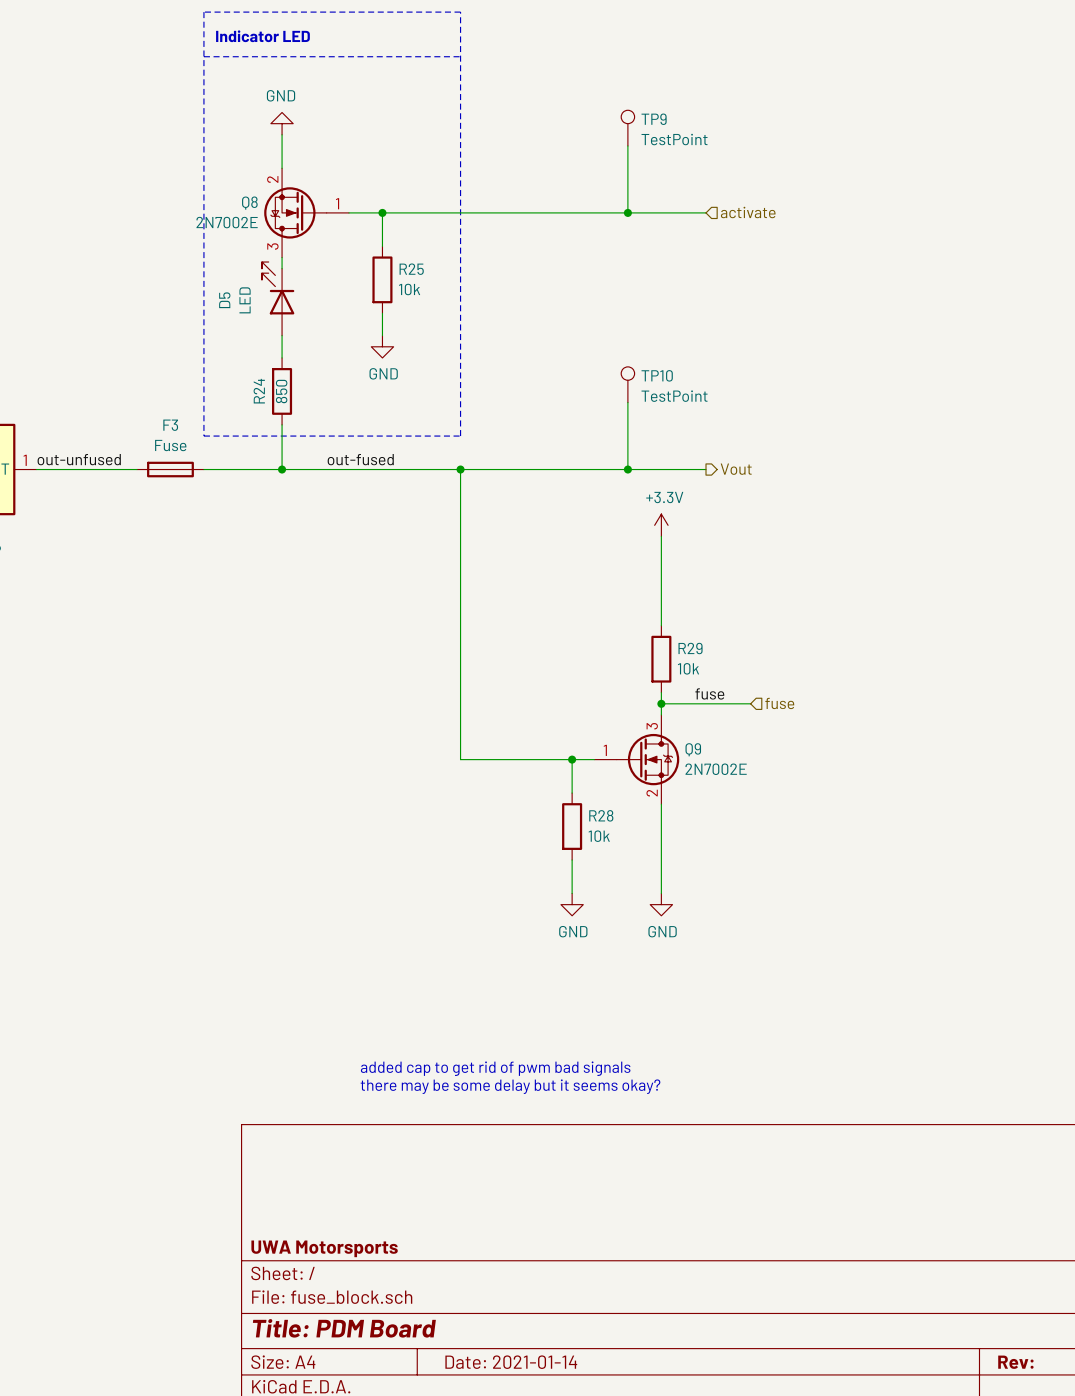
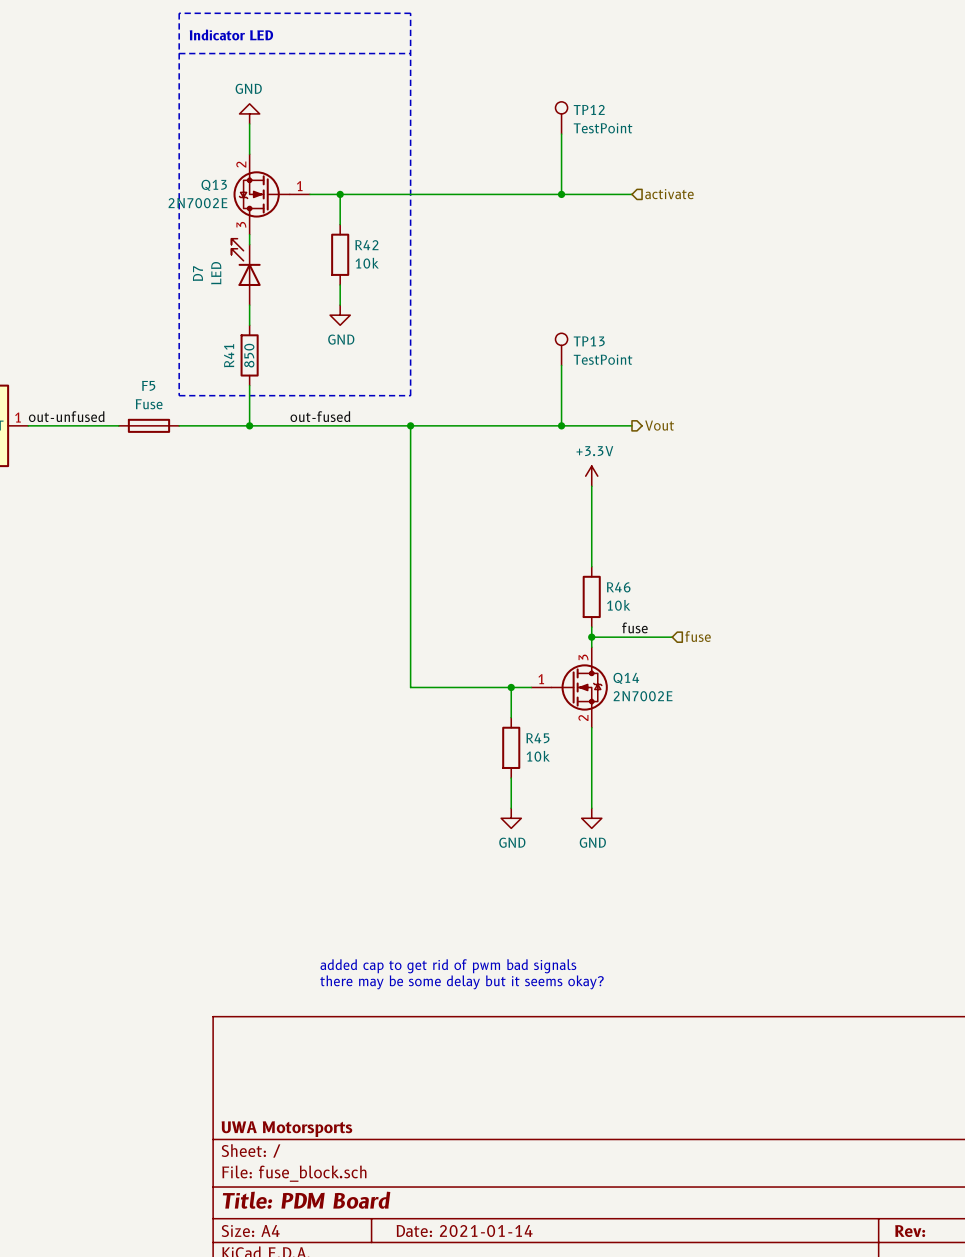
TP9 name: TP9 (654, 119) -> TP12 (589, 109)
Q8 name: Q8 (249, 203) -> Q13 (214, 185)
R25 name: R25 (411, 269) -> R42 (366, 245)
D5 name: D5 (224, 300) -> D7 (197, 273)
TP10 name: TP10 (657, 375) -> TP13 (589, 341)
R24 name: R24 (259, 391) -> R41 (229, 355)
F3 name: F3 (170, 425) -> F5 (148, 385)
R29 name: R29 (690, 648) -> R46 (618, 587)
Q9 name: Q9 (693, 749) -> Q14 (626, 678)
R28 name: R28 (601, 815) -> R45 (537, 738)

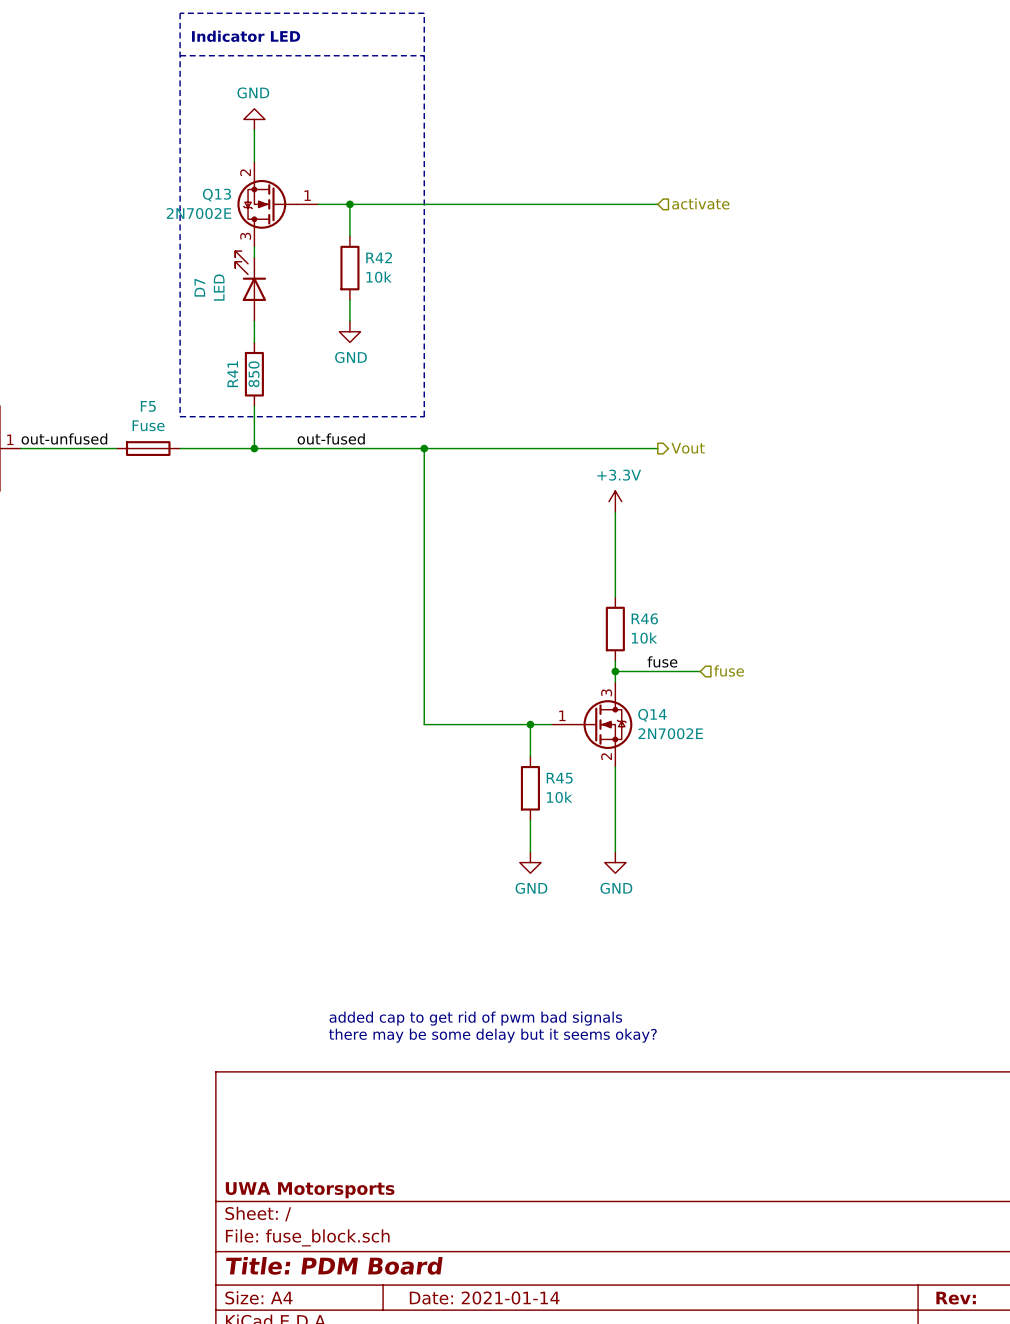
TP12: TestPoint (561, 117) -> none
wire: (561, 134) (561, 194) -> none
junction: (561, 194) -> none
TP13: TestPoint (561, 349) -> none
wire: (561, 365) (561, 425) -> none
junction: (561, 425) -> none

